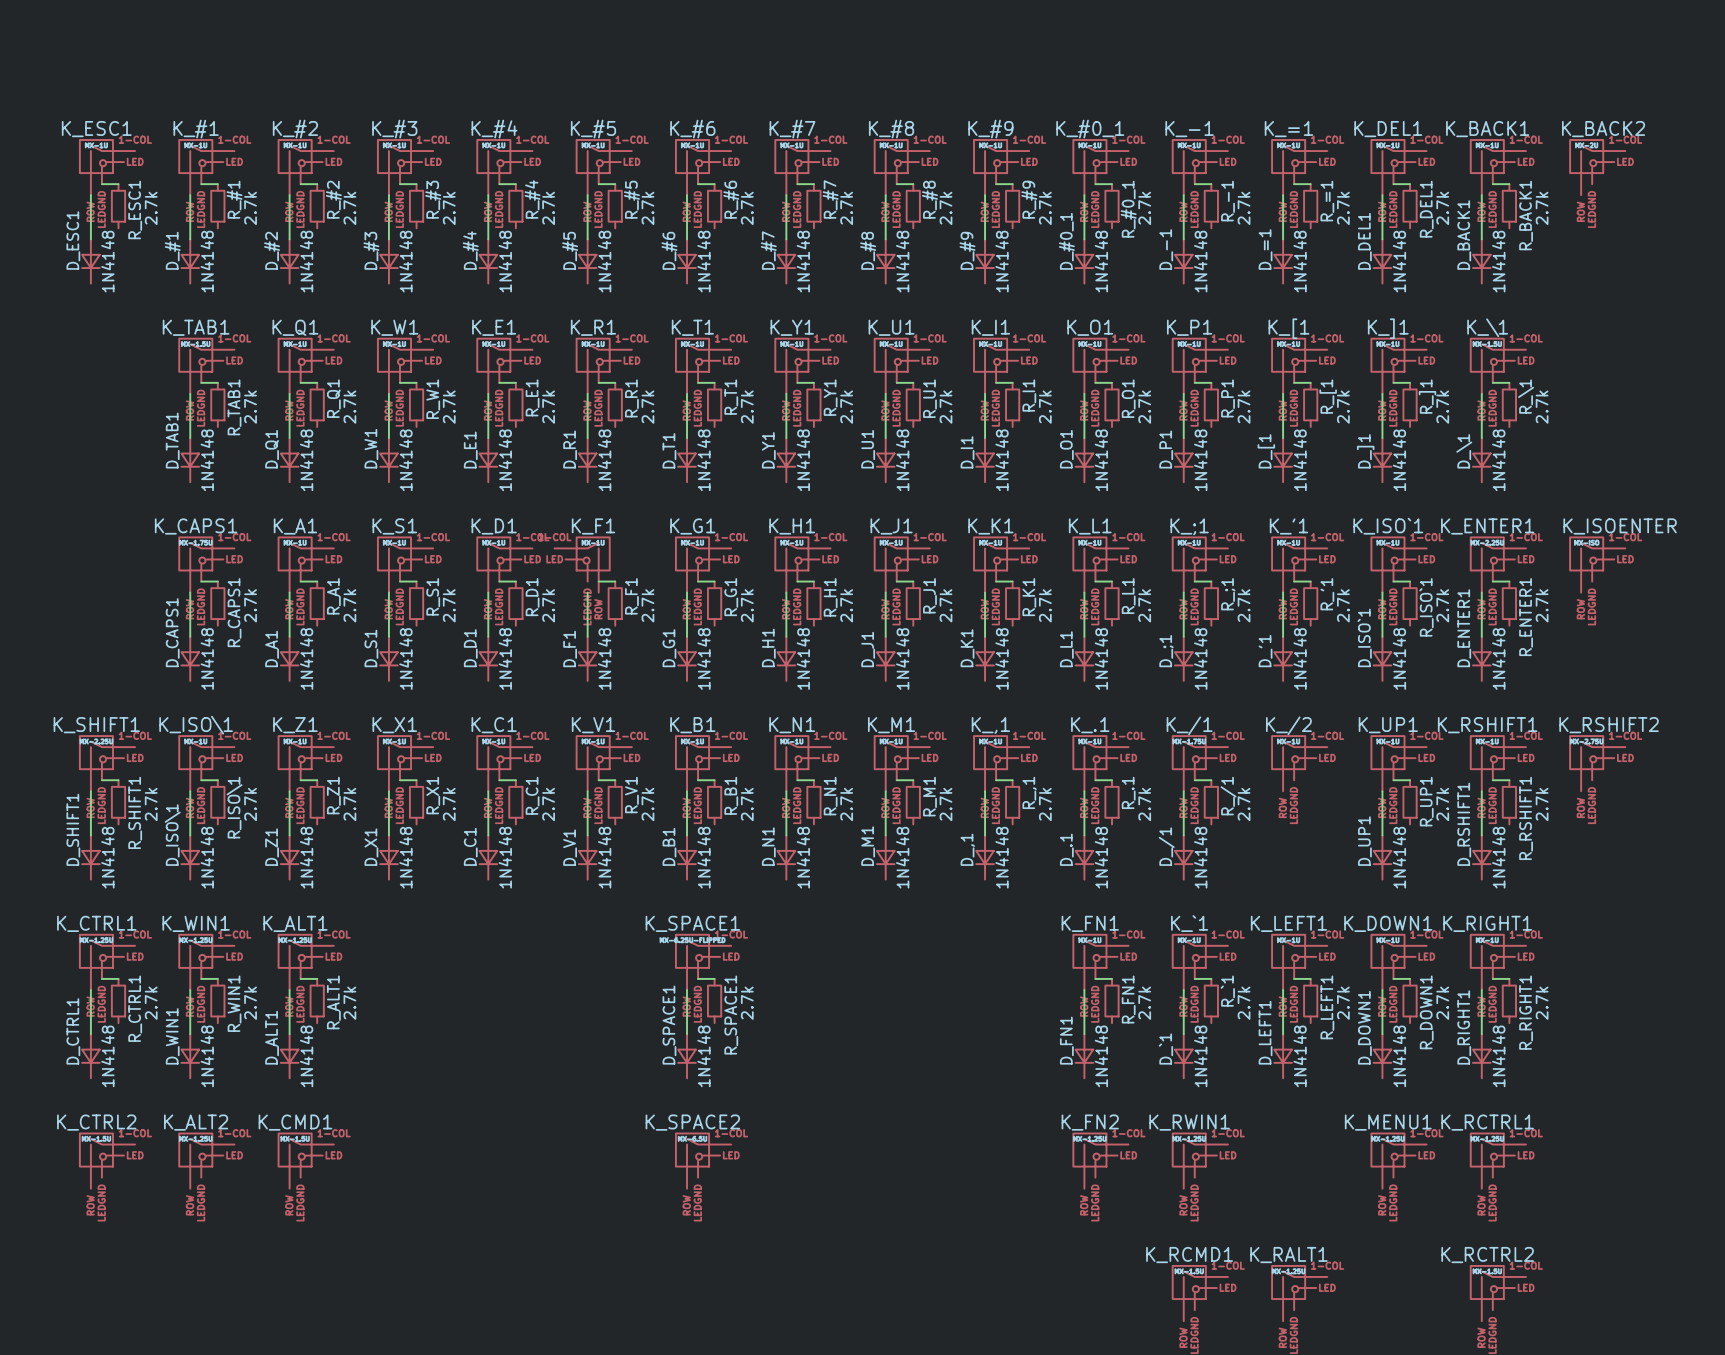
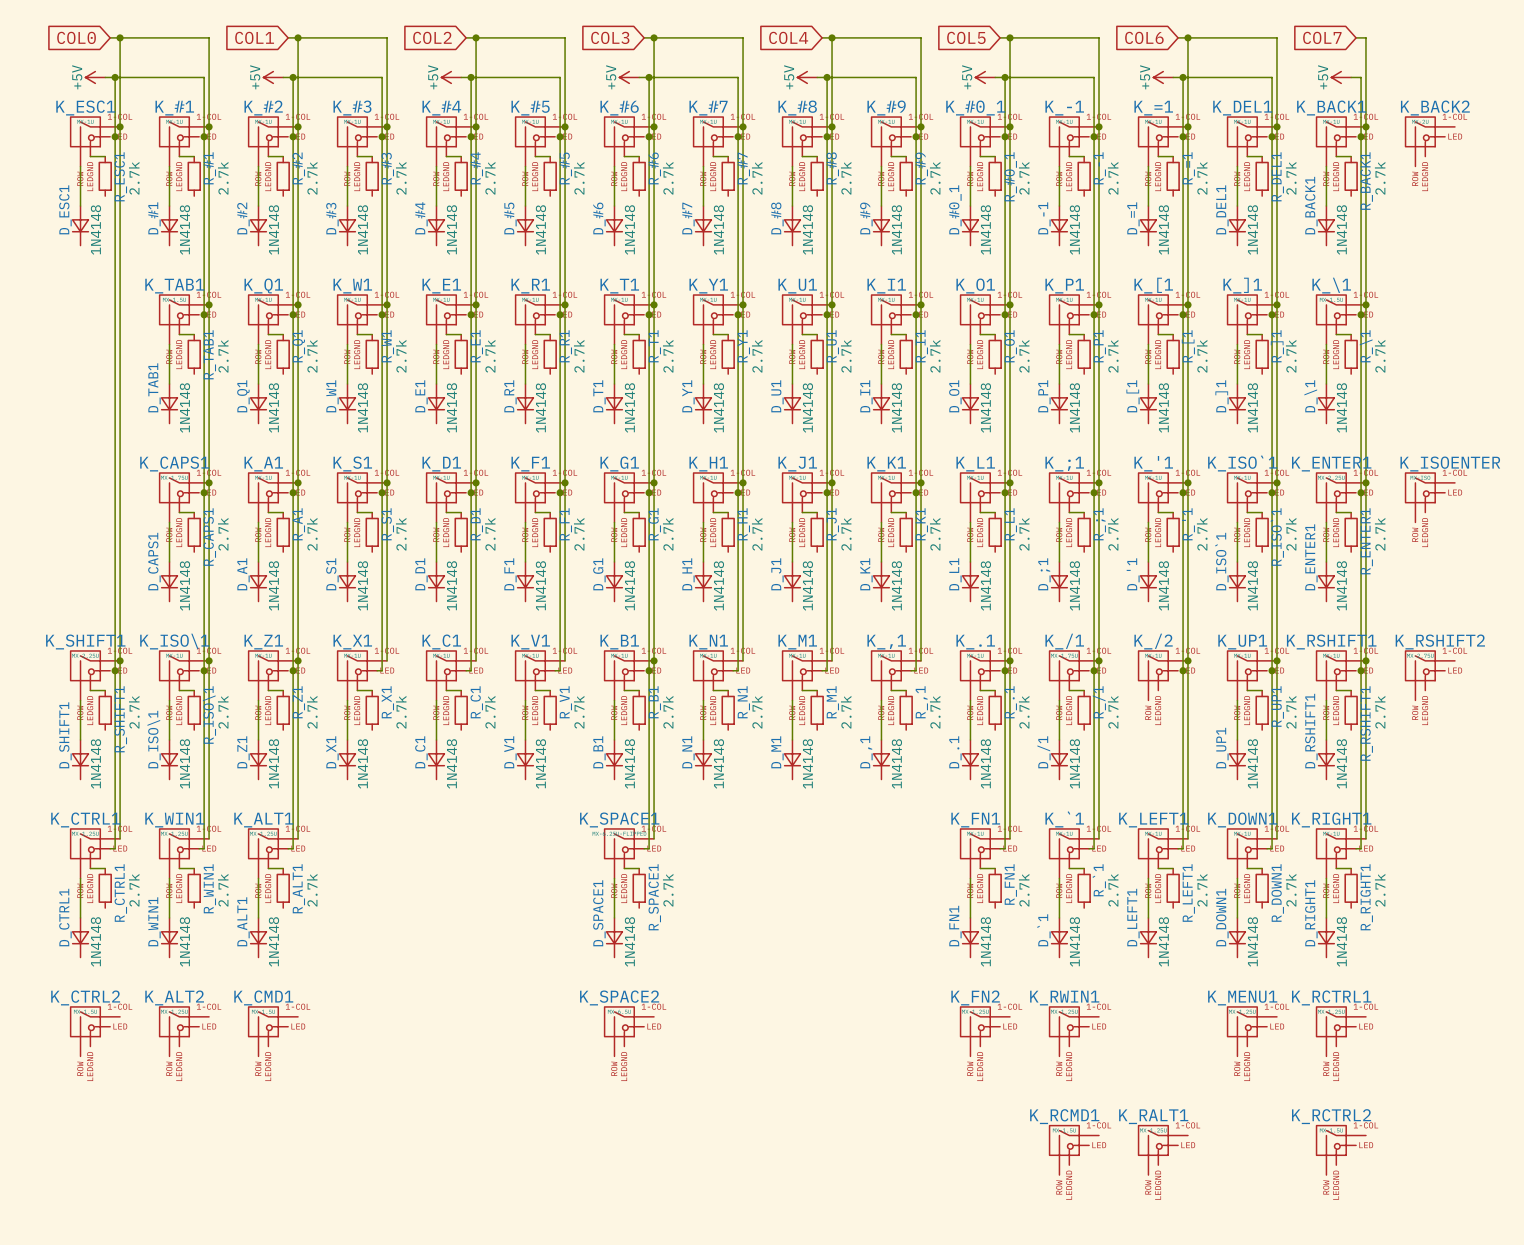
global label: none -> COL0 (76, 37)
wire: none -> (110, 37) (209, 37) (209, 838)
wire: none -> (120, 37) (120, 838)
junction: none -> (120, 37)
global label: none -> COL1 (254, 37)
wire: none -> (288, 37) (387, 37) (387, 660)
wire: none -> (298, 37) (298, 838)
junction: none -> (298, 37)
global label: none -> COL2 (432, 37)
wire: none -> (466, 37) (565, 37) (565, 660)
wire: none -> (476, 37) (476, 660)
junction: none -> (476, 37)
global label: none -> COL3 (610, 37)
wire: none -> (644, 37) (743, 37) (743, 660)
wire: none -> (654, 37) (654, 838)
junction: none -> (654, 37)
global label: none -> COL4 (788, 37)
wire: none -> (822, 37) (921, 37) (921, 660)
wire: none -> (832, 37) (832, 660)
junction: none -> (832, 37)
global label: none -> COL5 (966, 37)
wire: none -> (1000, 37) (1099, 37) (1099, 838)
wire: none -> (1010, 37) (1010, 838)
junction: none -> (1010, 37)
global label: none -> COL6 (1144, 37)
wire: none -> (1178, 37) (1276, 37) (1276, 838)
wire: none -> (1187, 37) (1187, 838)
junction: none -> (1187, 37)
global label: none -> COL7 (1322, 37)
wire: none -> (1356, 37) (1365, 37) (1365, 838)
power symbol: none -> +5V (95, 77)
wire: none -> (105, 77) (204, 77) (204, 848) (199, 848)
wire: none -> (115, 77) (115, 848) (110, 848)
junction: none -> (115, 77)
power symbol: none -> +5V (273, 77)
wire: none -> (283, 77) (382, 77) (382, 670) (377, 670)
wire: none -> (293, 77) (293, 848) (288, 848)
junction: none -> (293, 77)
power symbol: none -> +5V (451, 77)
wire: none -> (461, 77) (560, 77) (560, 670) (555, 670)
wire: none -> (471, 77) (471, 670) (466, 670)
junction: none -> (471, 77)
power symbol: none -> +5V (629, 77)
wire: none -> (639, 77) (738, 77) (738, 670) (733, 670)
wire: none -> (649, 77) (649, 848) (644, 848)
junction: none -> (649, 77)
power symbol: none -> +5V (807, 77)
wire: none -> (817, 77) (916, 77) (916, 670) (911, 670)
wire: none -> (827, 77) (827, 670) (822, 670)
junction: none -> (827, 77)
power symbol: none -> +5V (985, 77)
wire: none -> (995, 77) (1094, 77) (1094, 848) (1089, 848)
wire: none -> (1005, 77) (1005, 848) (1000, 848)
junction: none -> (1005, 77)
power symbol: none -> +5V (1163, 77)
wire: none -> (1173, 77) (1272, 77) (1272, 848) (1267, 848)
wire: none -> (1183, 77) (1183, 848) (1178, 848)
junction: none -> (1183, 77)
power symbol: none -> +5V (1341, 77)
wire: none -> (1351, 77) (1361, 77) (1361, 848) (1356, 848)
junction: none -> (120, 126)
junction: none -> (209, 126)
junction: none -> (298, 126)
junction: none -> (387, 126)
junction: none -> (476, 126)
junction: none -> (565, 126)
junction: none -> (654, 126)
junction: none -> (743, 126)
junction: none -> (832, 126)
junction: none -> (921, 126)
junction: none -> (1010, 126)
junction: none -> (1099, 126)
junction: none -> (1187, 126)
junction: none -> (1276, 126)
junction: none -> (1365, 126)
junction: none -> (115, 136)
junction: none -> (204, 136)
junction: none -> (293, 136)
junction: none -> (382, 136)
junction: none -> (471, 136)
junction: none -> (560, 136)
junction: none -> (649, 136)
junction: none -> (738, 136)
junction: none -> (827, 136)
junction: none -> (916, 136)
junction: none -> (1005, 136)
junction: none -> (1094, 136)
junction: none -> (1183, 136)
junction: none -> (1272, 136)
junction: none -> (1361, 136)
junction: none -> (209, 304)
junction: none -> (298, 304)
junction: none -> (387, 304)
junction: none -> (476, 304)
junction: none -> (565, 304)
junction: none -> (654, 304)
junction: none -> (743, 304)
junction: none -> (832, 304)
junction: none -> (921, 304)
junction: none -> (1010, 304)
junction: none -> (1099, 304)
junction: none -> (1187, 304)
junction: none -> (1276, 304)
junction: none -> (1365, 304)
junction: none -> (204, 314)
junction: none -> (293, 314)
junction: none -> (382, 314)
junction: none -> (471, 314)
junction: none -> (560, 314)
junction: none -> (649, 314)
junction: none -> (738, 314)
junction: none -> (827, 314)
junction: none -> (916, 314)
junction: none -> (1005, 314)
junction: none -> (1094, 314)
junction: none -> (1183, 314)
junction: none -> (1272, 314)
junction: none -> (1361, 314)
junction: none -> (209, 482)
junction: none -> (298, 482)
junction: none -> (387, 482)
junction: none -> (476, 482)
junction: none -> (565, 482)
junction: none -> (654, 482)
junction: none -> (743, 482)
junction: none -> (832, 482)
junction: none -> (921, 482)
junction: none -> (1010, 482)
junction: none -> (1099, 482)
junction: none -> (1187, 482)
junction: none -> (1276, 482)
junction: none -> (1365, 482)
K_F1 flip: as is (593, 553) -> left-right (530, 487)
junction: none -> (204, 492)
junction: none -> (293, 492)
junction: none -> (382, 492)
junction: none -> (471, 492)
junction: none -> (560, 492)
junction: none -> (649, 492)
junction: none -> (738, 492)
junction: none -> (827, 492)
junction: none -> (916, 492)
junction: none -> (1005, 492)
junction: none -> (1094, 492)
junction: none -> (1183, 492)
junction: none -> (1272, 492)
junction: none -> (1361, 492)
junction: none -> (120, 660)
junction: none -> (209, 660)
junction: none -> (298, 660)
junction: none -> (654, 660)
junction: none -> (1010, 660)
junction: none -> (1099, 660)
junction: none -> (1187, 660)
junction: none -> (1276, 660)
junction: none -> (1365, 660)
junction: none -> (115, 670)
junction: none -> (204, 670)
junction: none -> (293, 670)
junction: none -> (649, 670)
junction: none -> (1005, 670)
junction: none -> (1094, 670)
junction: none -> (1183, 670)
junction: none -> (1272, 670)
junction: none -> (1361, 670)

